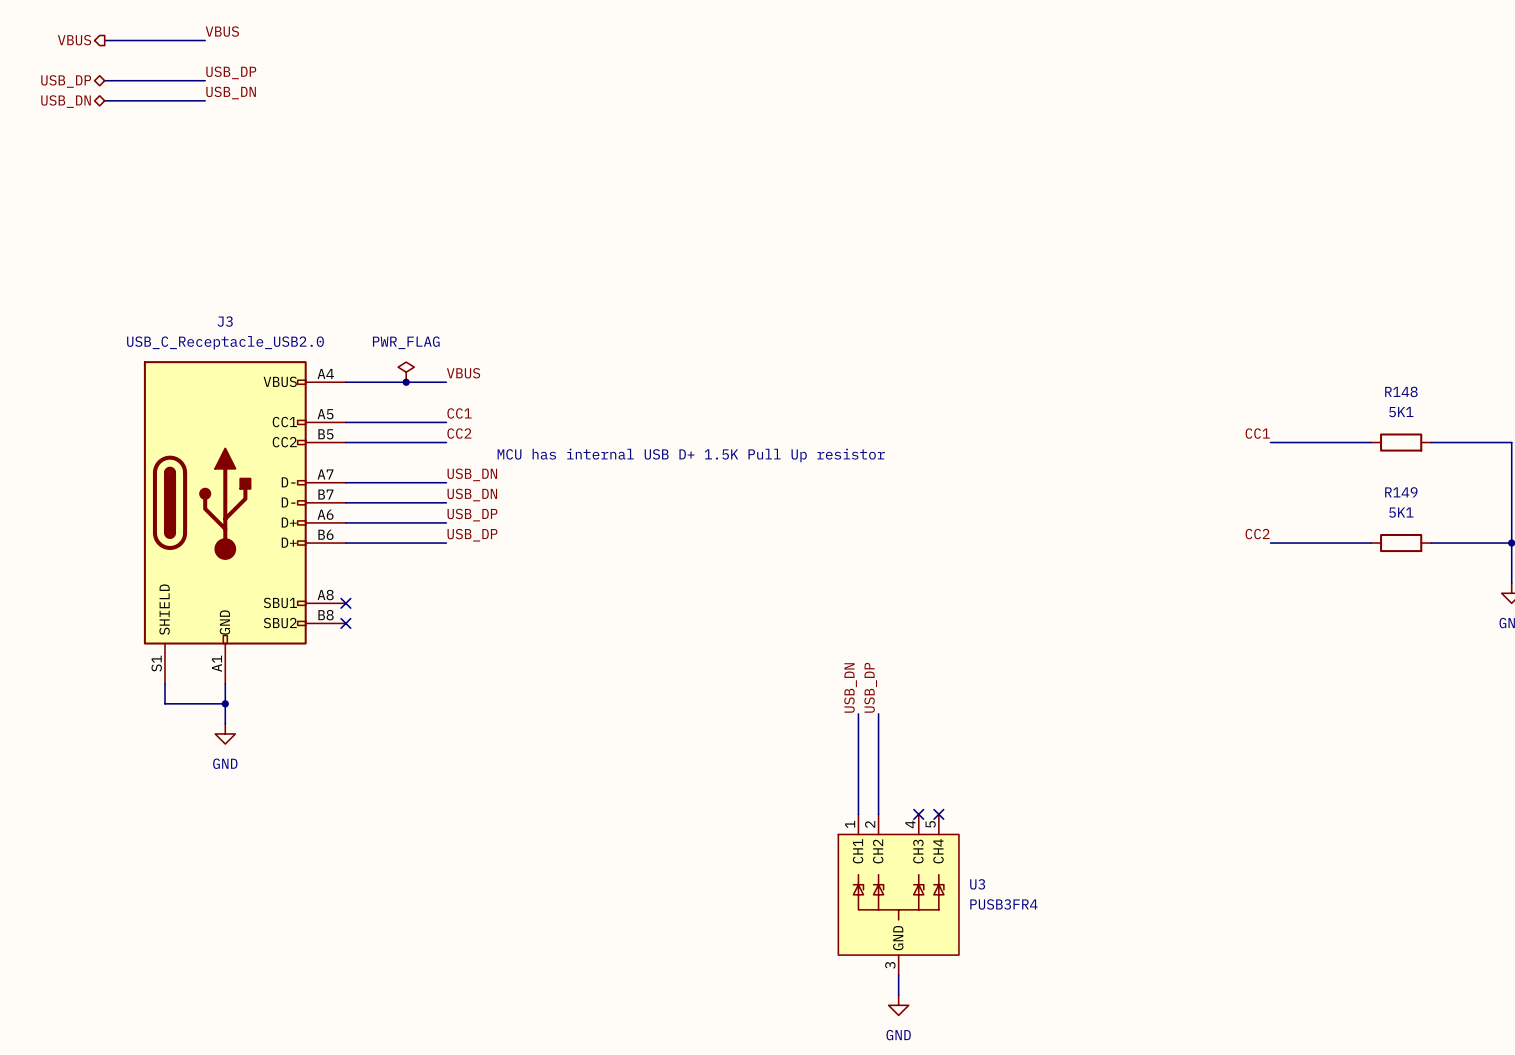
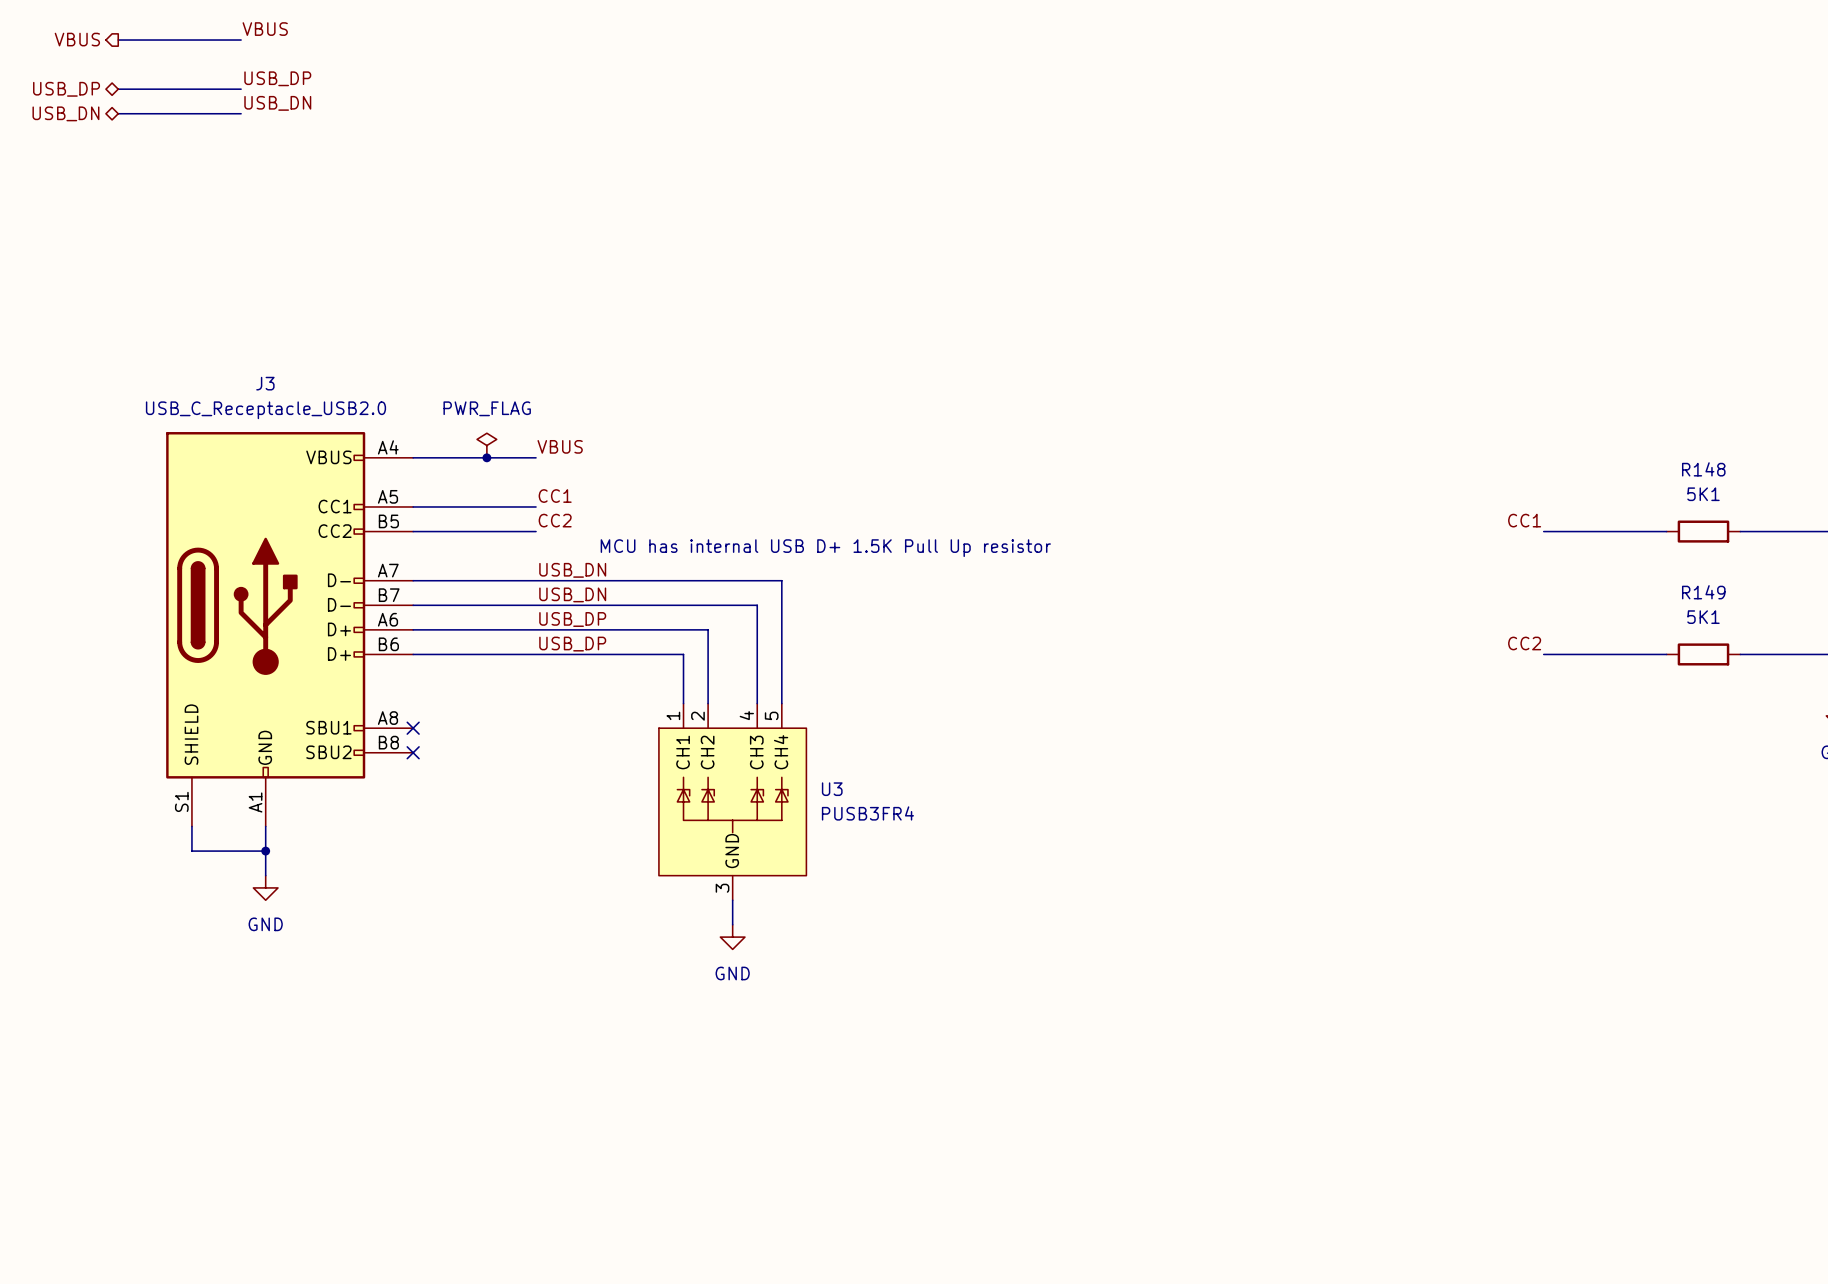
wire: none -> (536, 580) (781, 580) (781, 703)
wire: none -> (536, 605) (757, 605) (757, 703)
wire: none -> (536, 629) (708, 629) (708, 703)
wire: none -> (536, 654) (683, 654) (683, 703)
label: USB_DN (850, 687) -> none
label: USB_DP (870, 687) -> none
wire: (858, 713) (858, 814) -> none
wire: (878, 713) (878, 814) -> none
wire: none -> (732, 900) (732, 924)
power symbol: none -> GND (732, 937)
no-connect mark: (918, 814) -> none
no-connect mark: (938, 814) -> none
U3 position: (898, 894) -> (732, 801)
wire: (898, 975) (898, 995) -> none
power symbol: GND (898, 1005) -> none

